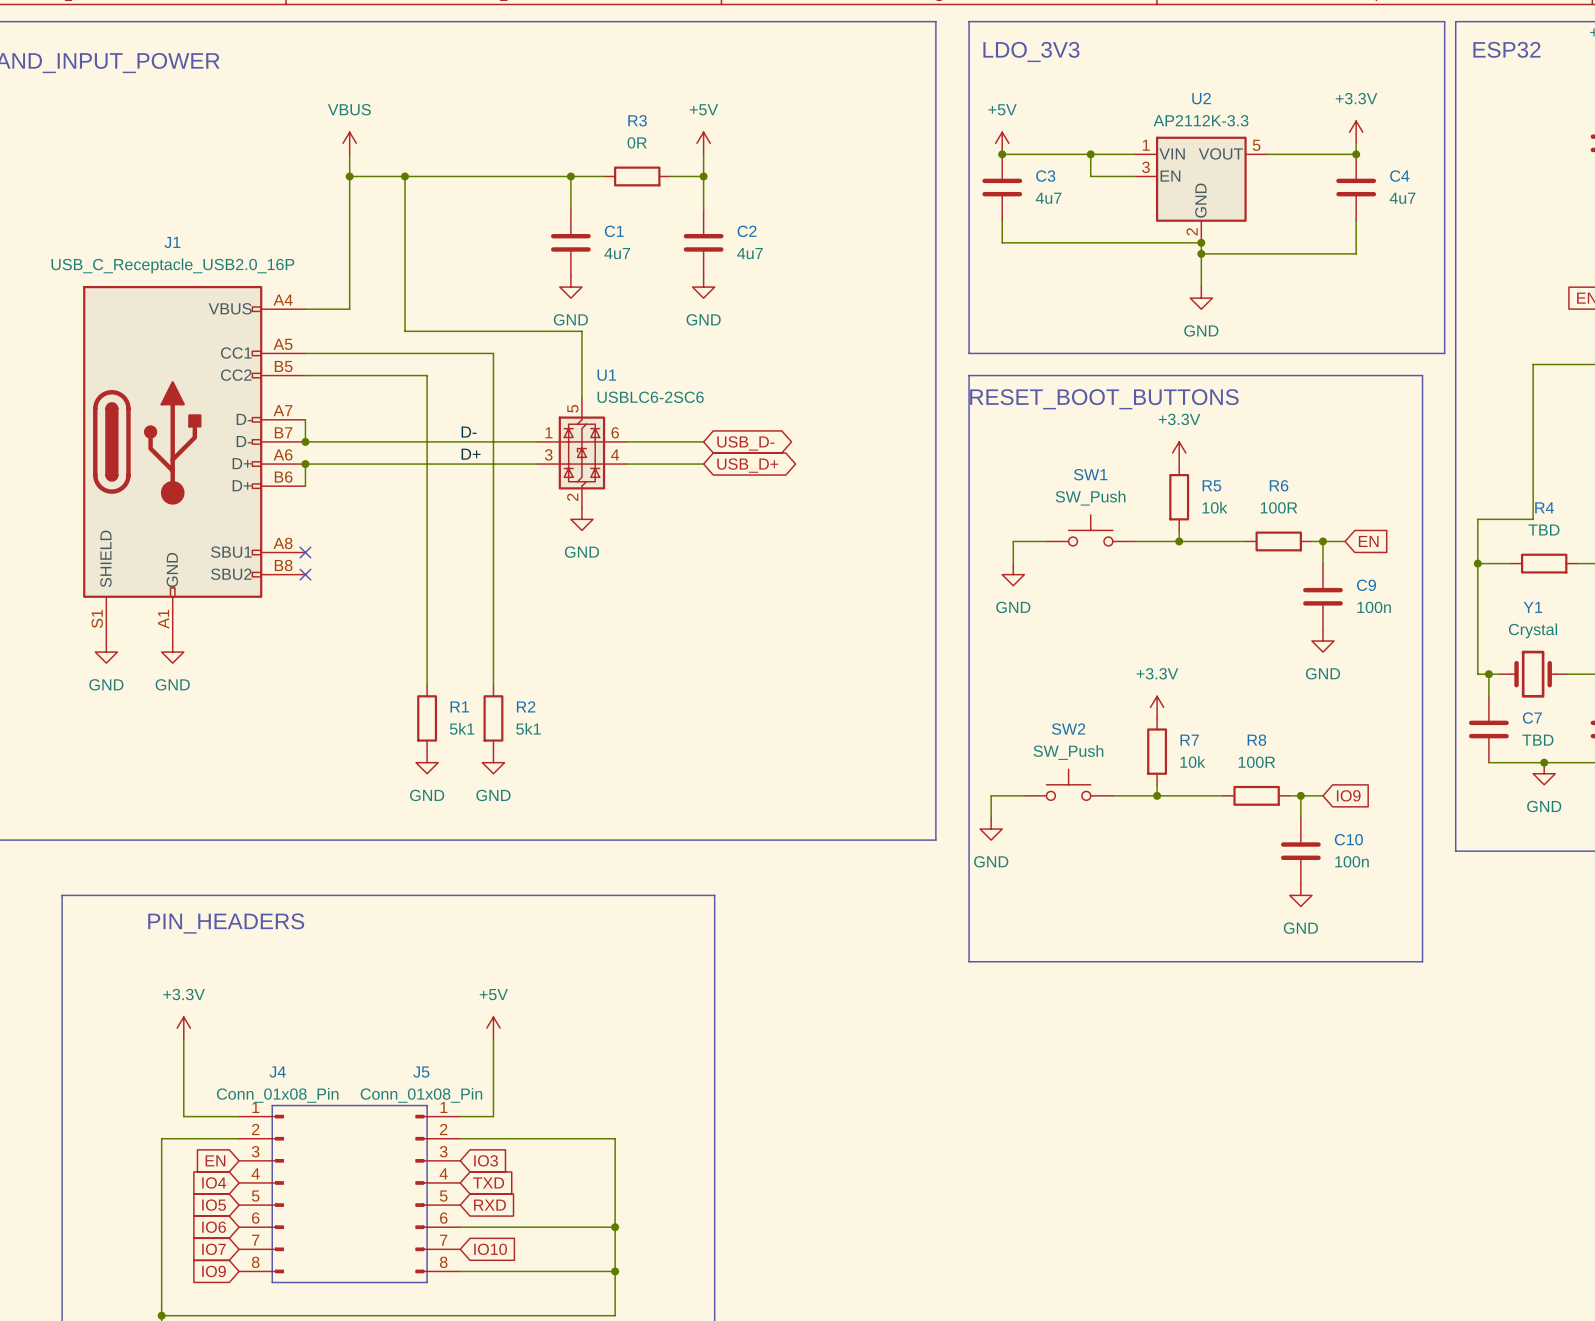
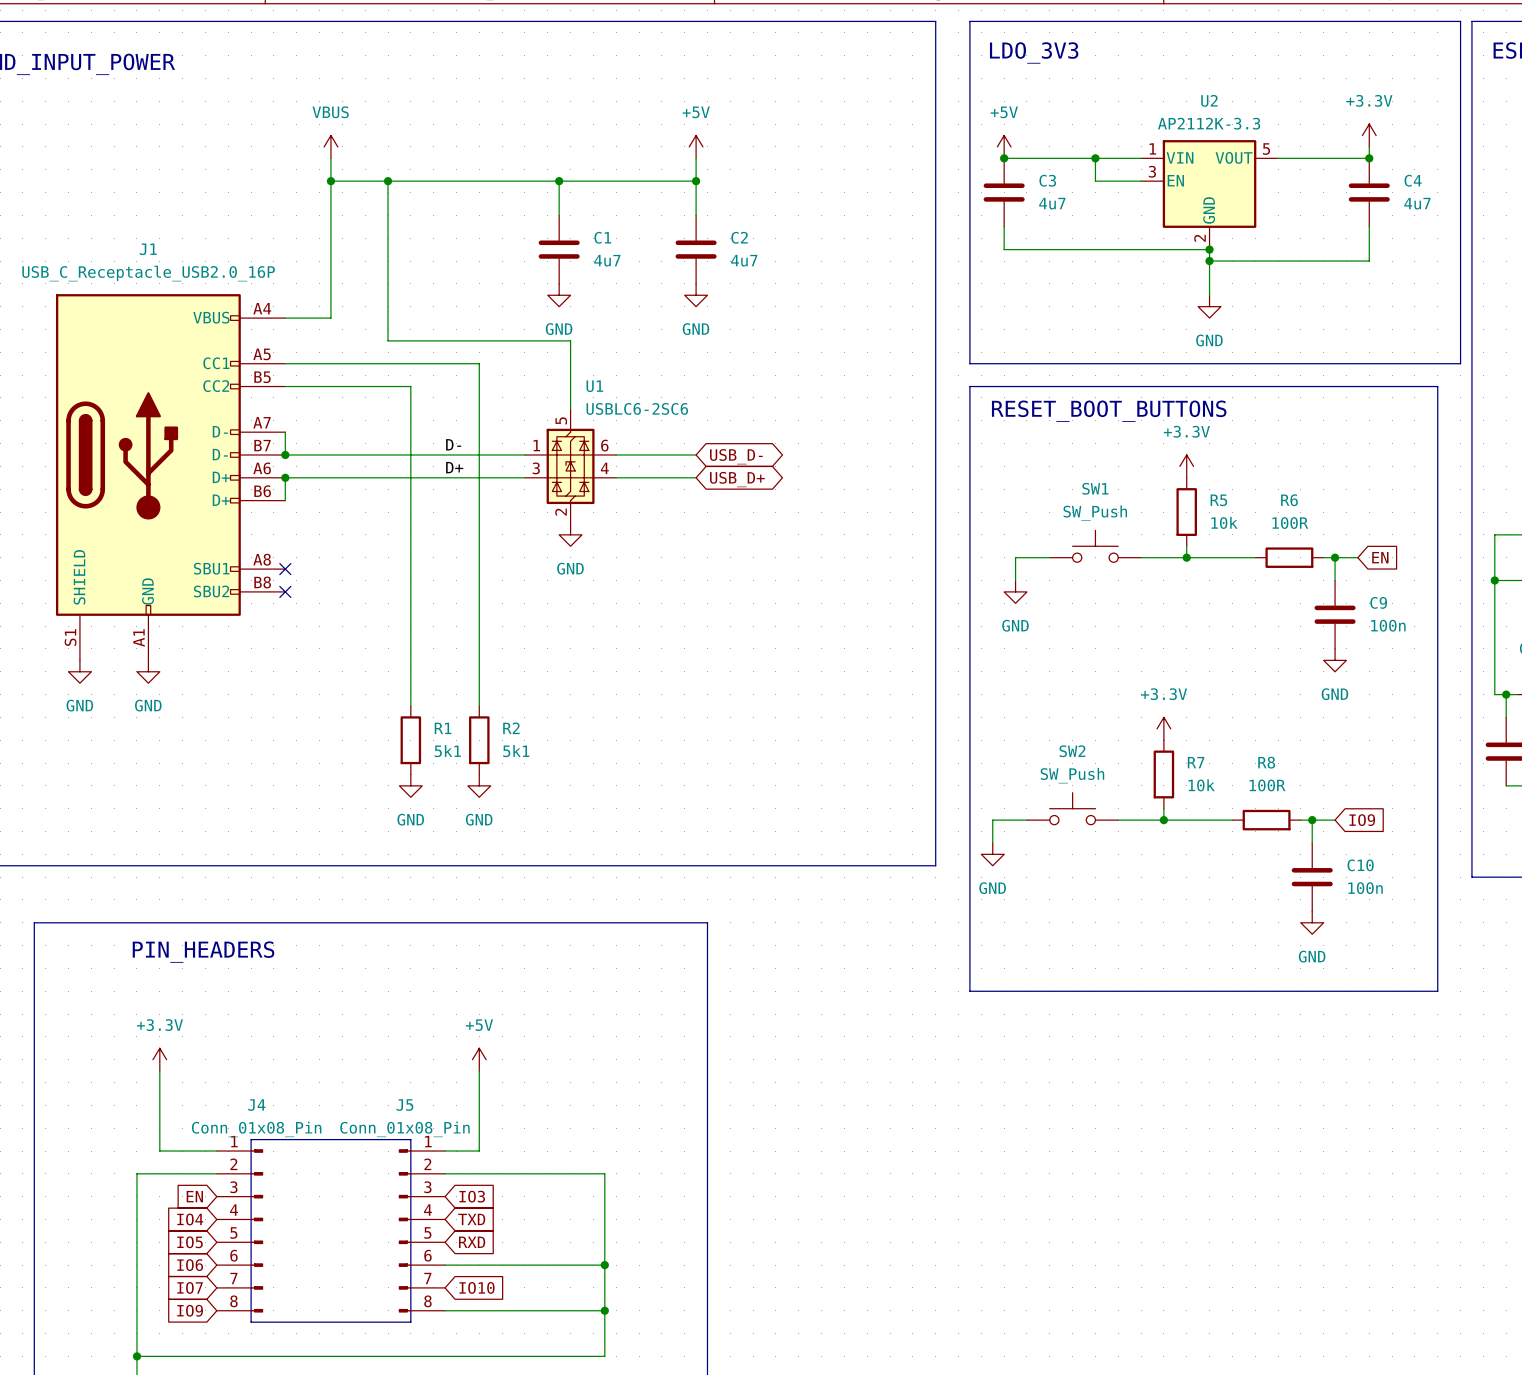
wire: none -> (593, 181) (661, 181)
R3: 0R (637, 176) -> none

